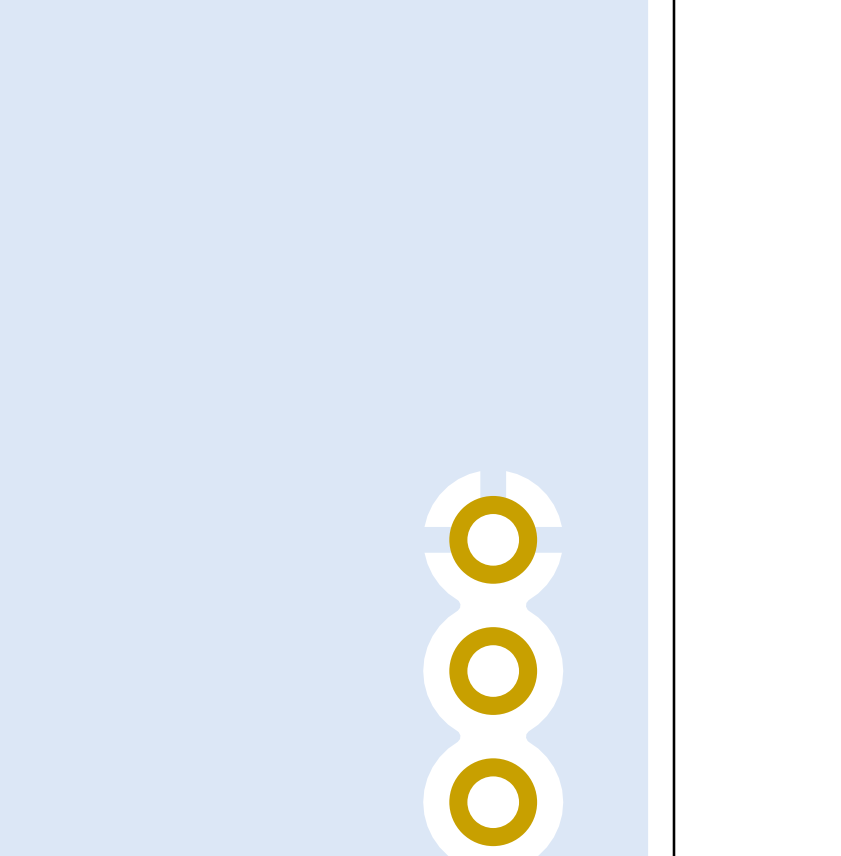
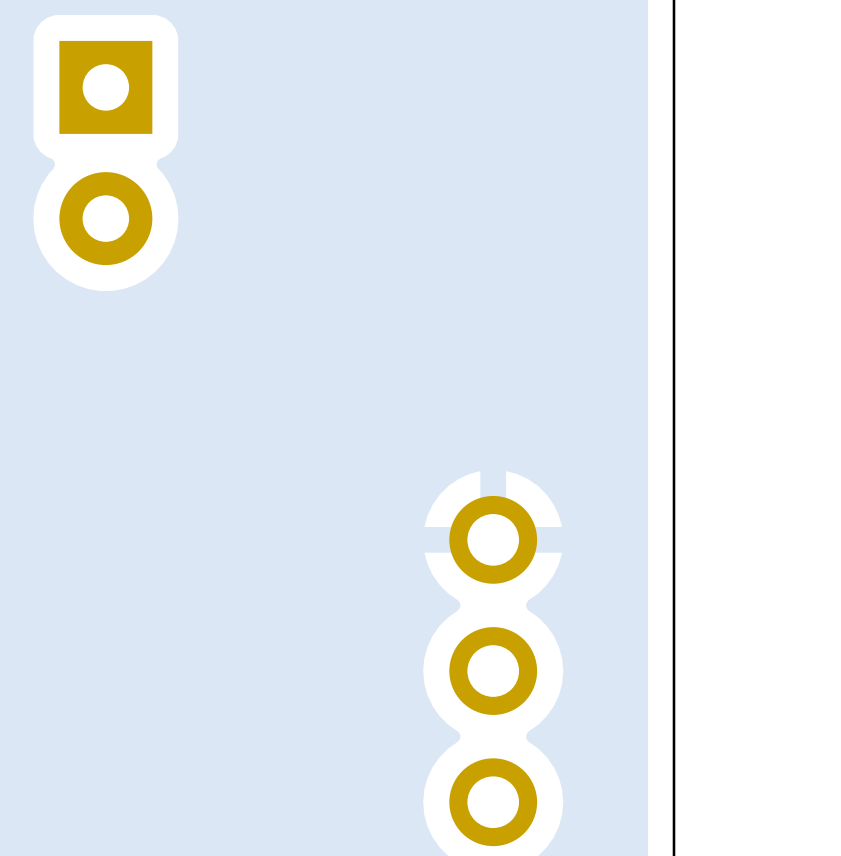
part: none -> (105, 153)

